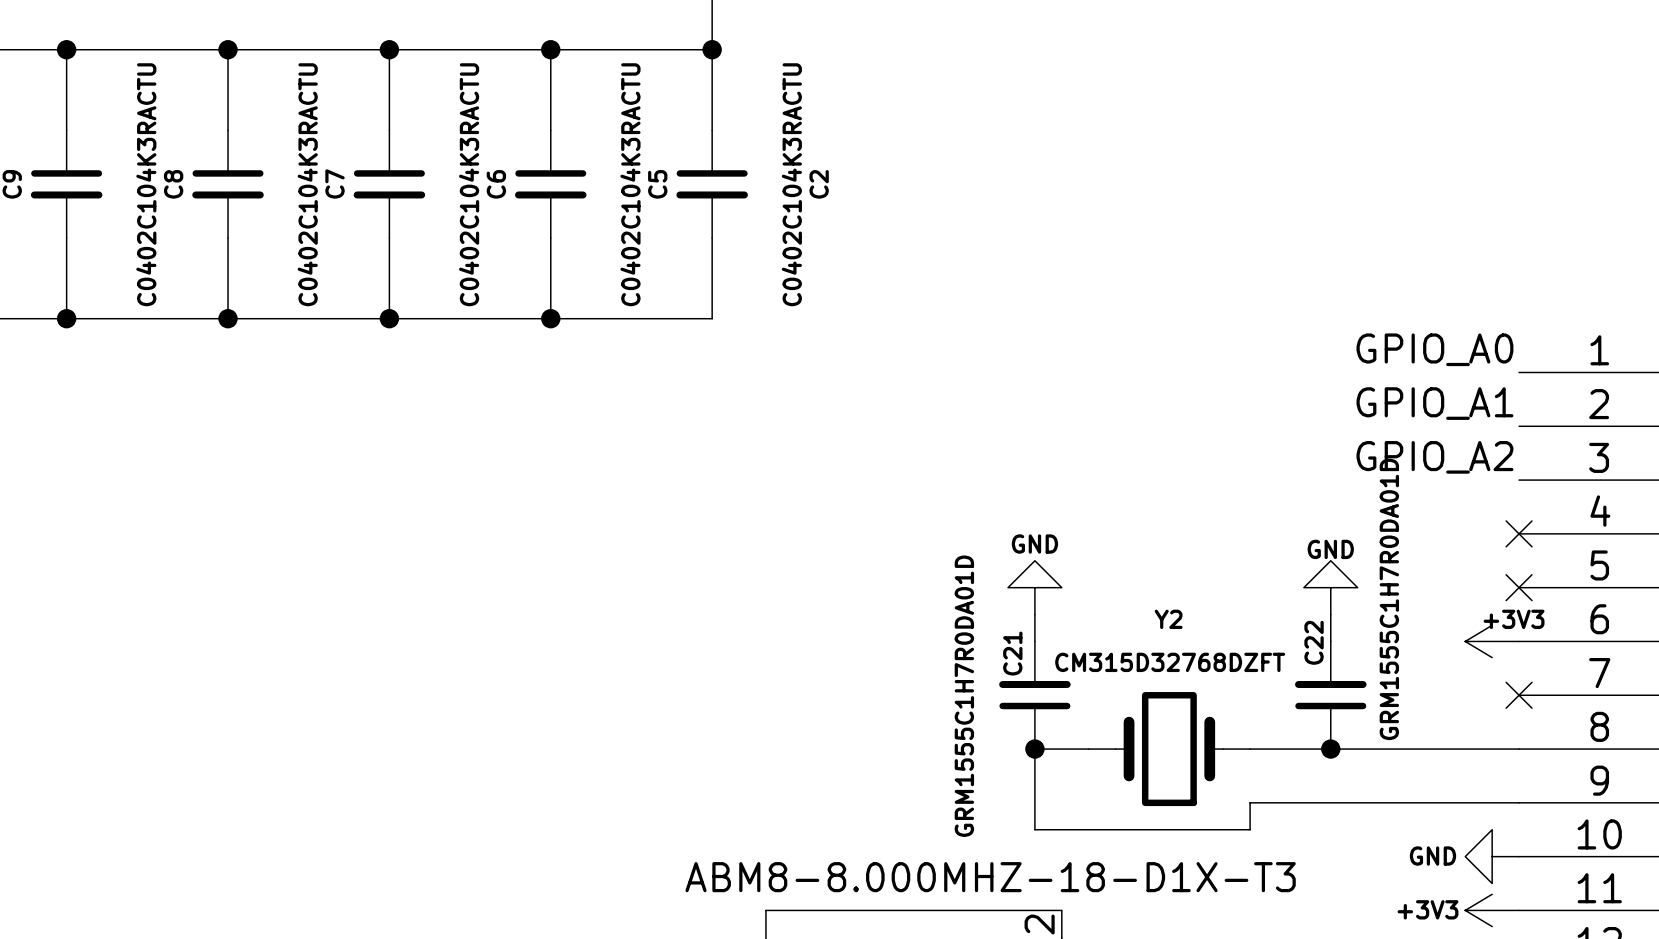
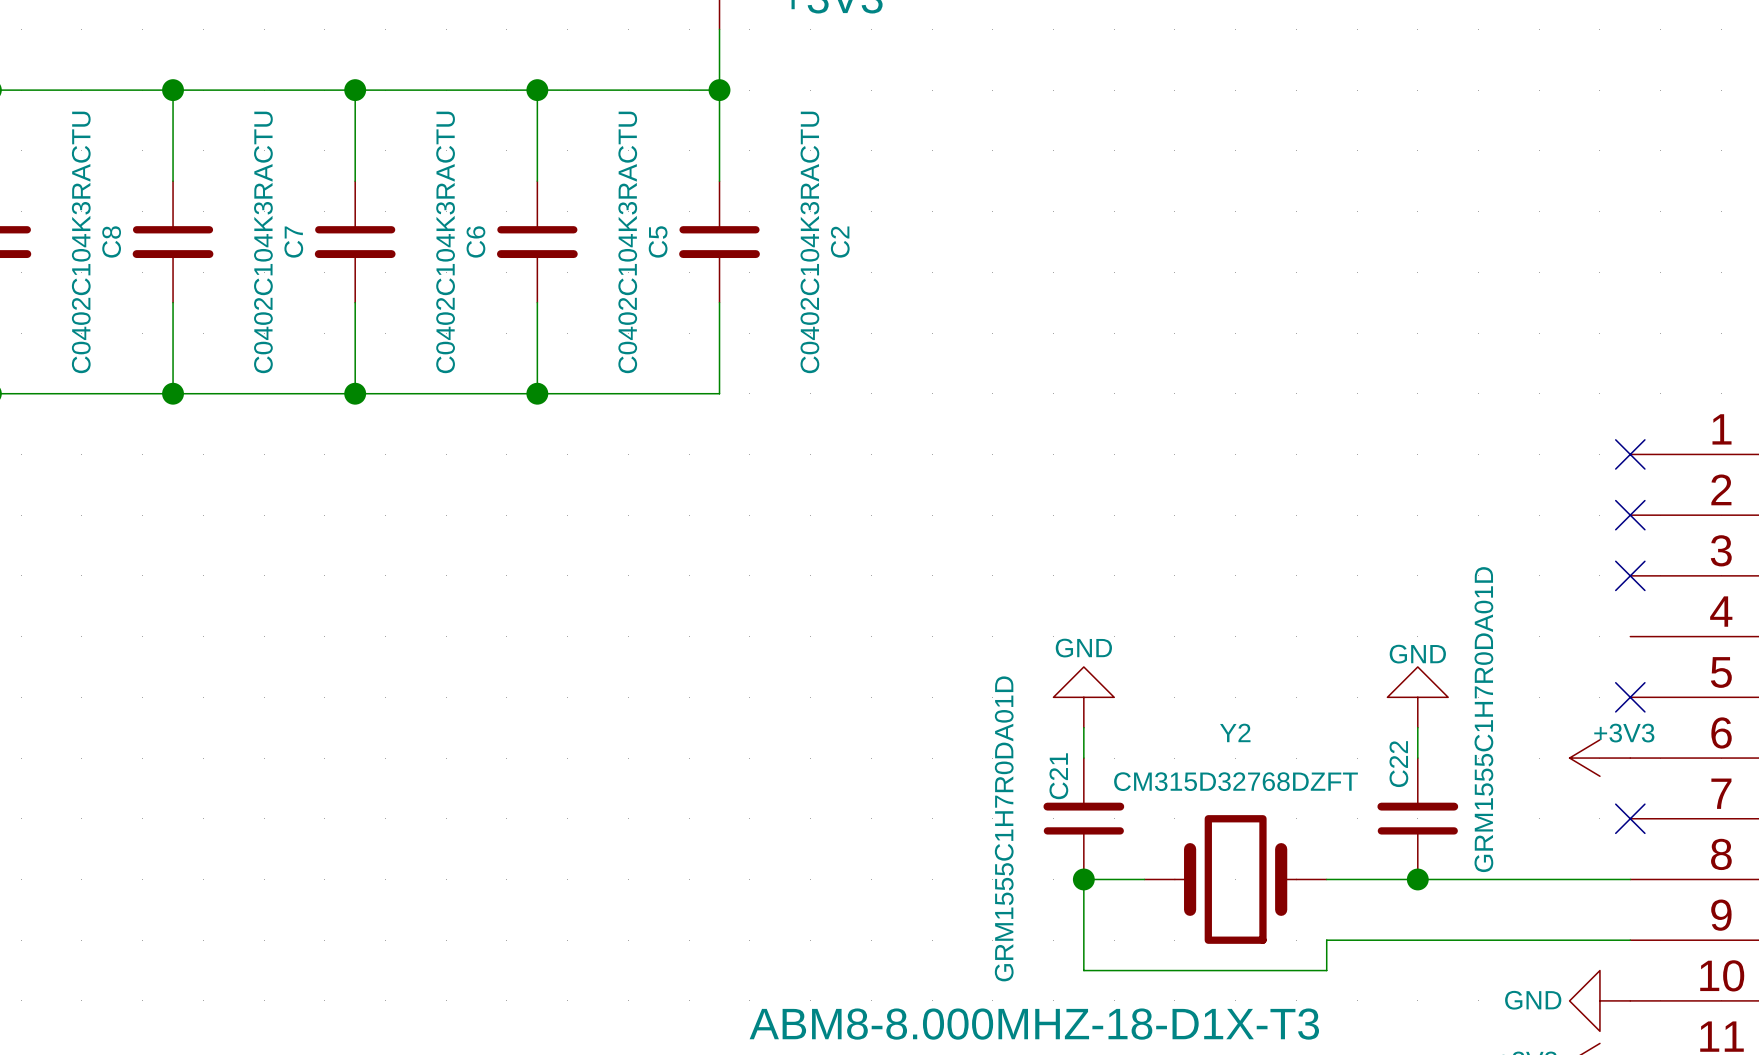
label: GPIO_A0 (1434, 349) -> none
no-connect mark: none -> (1630, 454)
label: GPIO_A1 (1434, 403) -> none
no-connect mark: none -> (1630, 515)
label: GPIO_A2 (1434, 457) -> none
no-connect mark: none -> (1630, 575)
no-connect mark: (1519, 533) -> none

